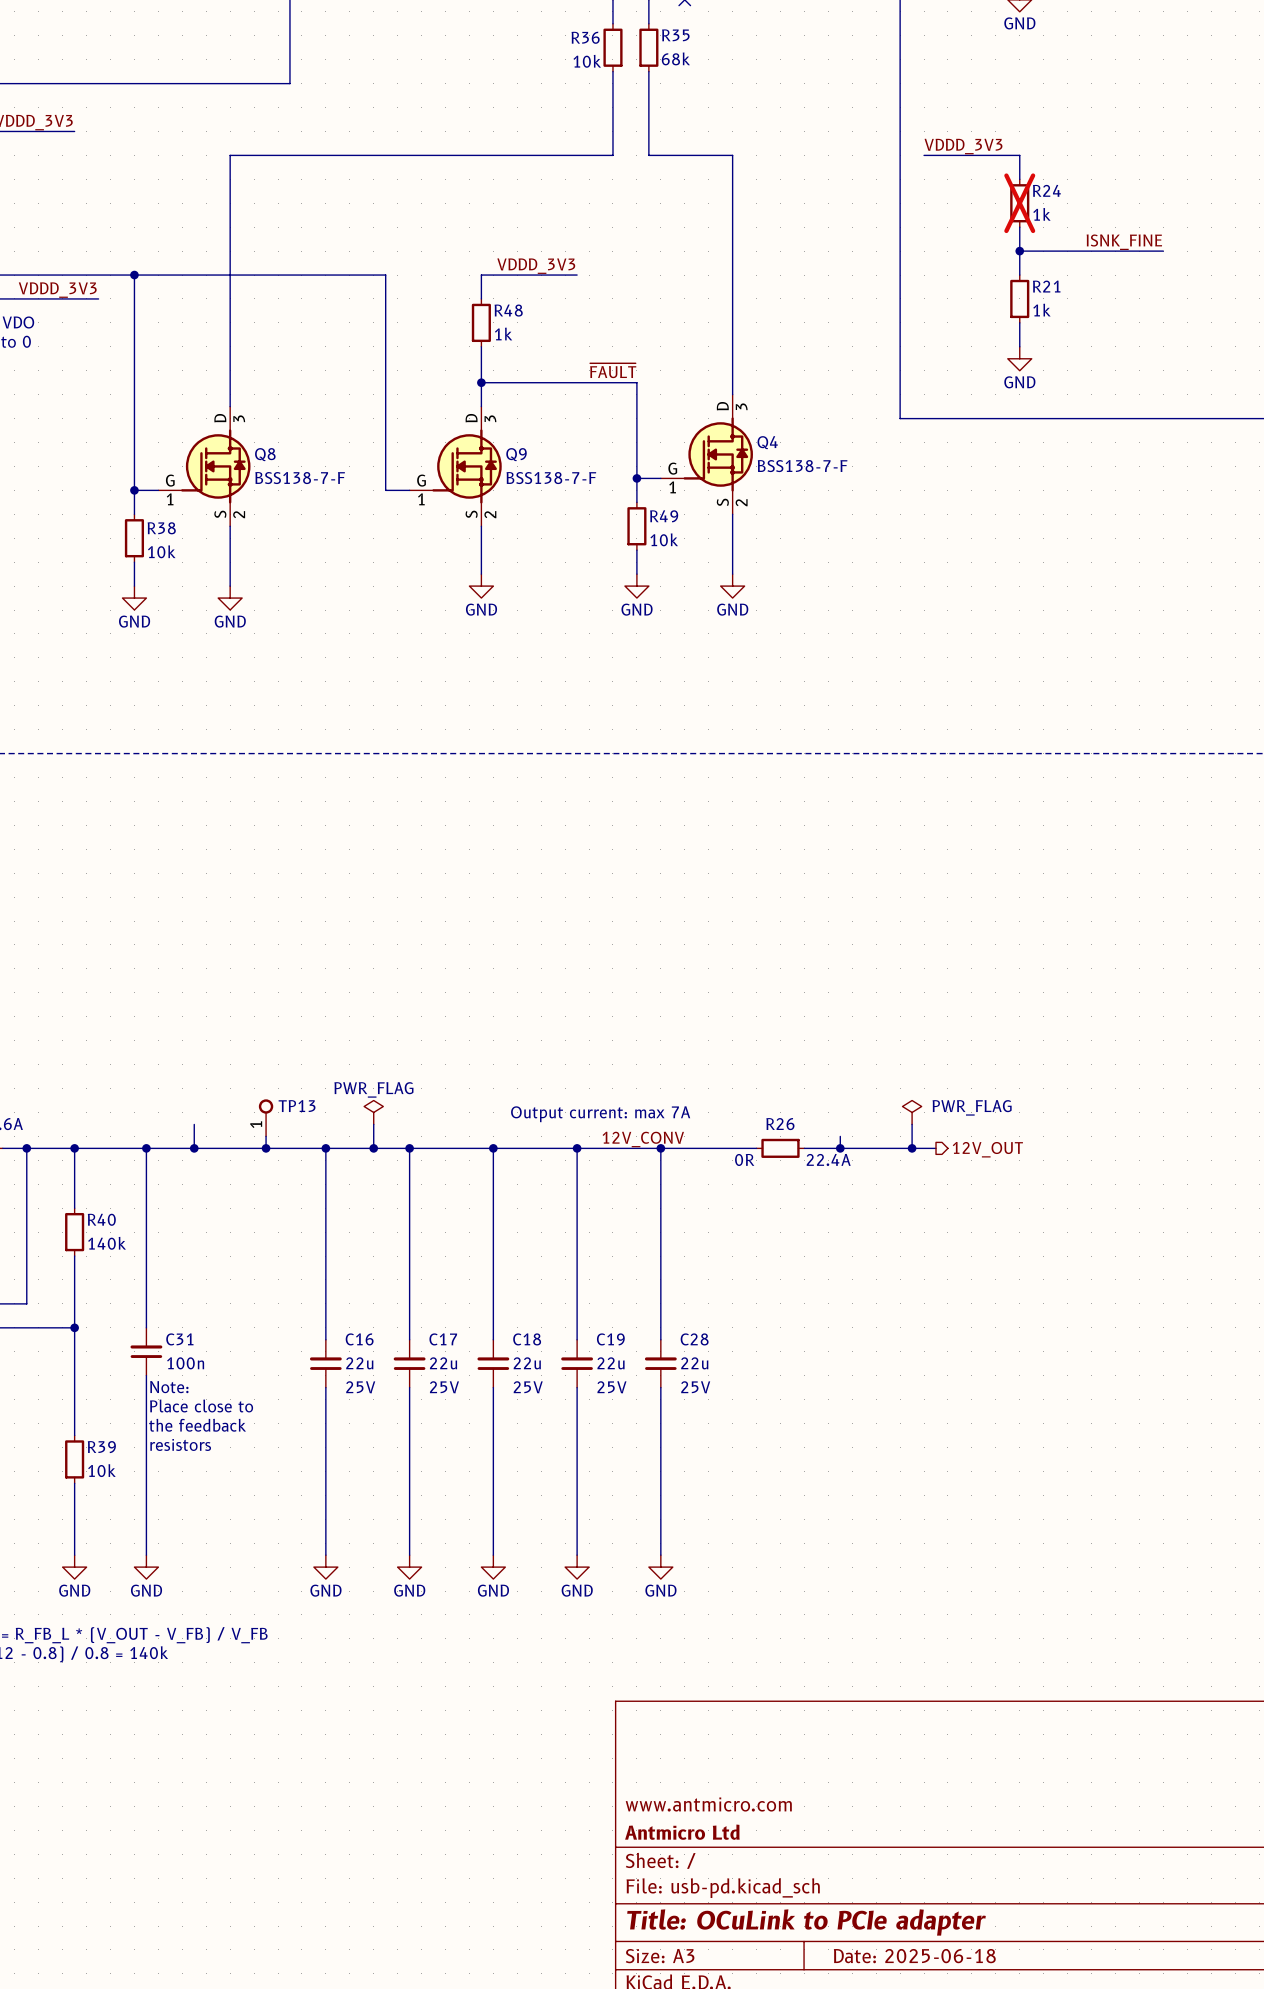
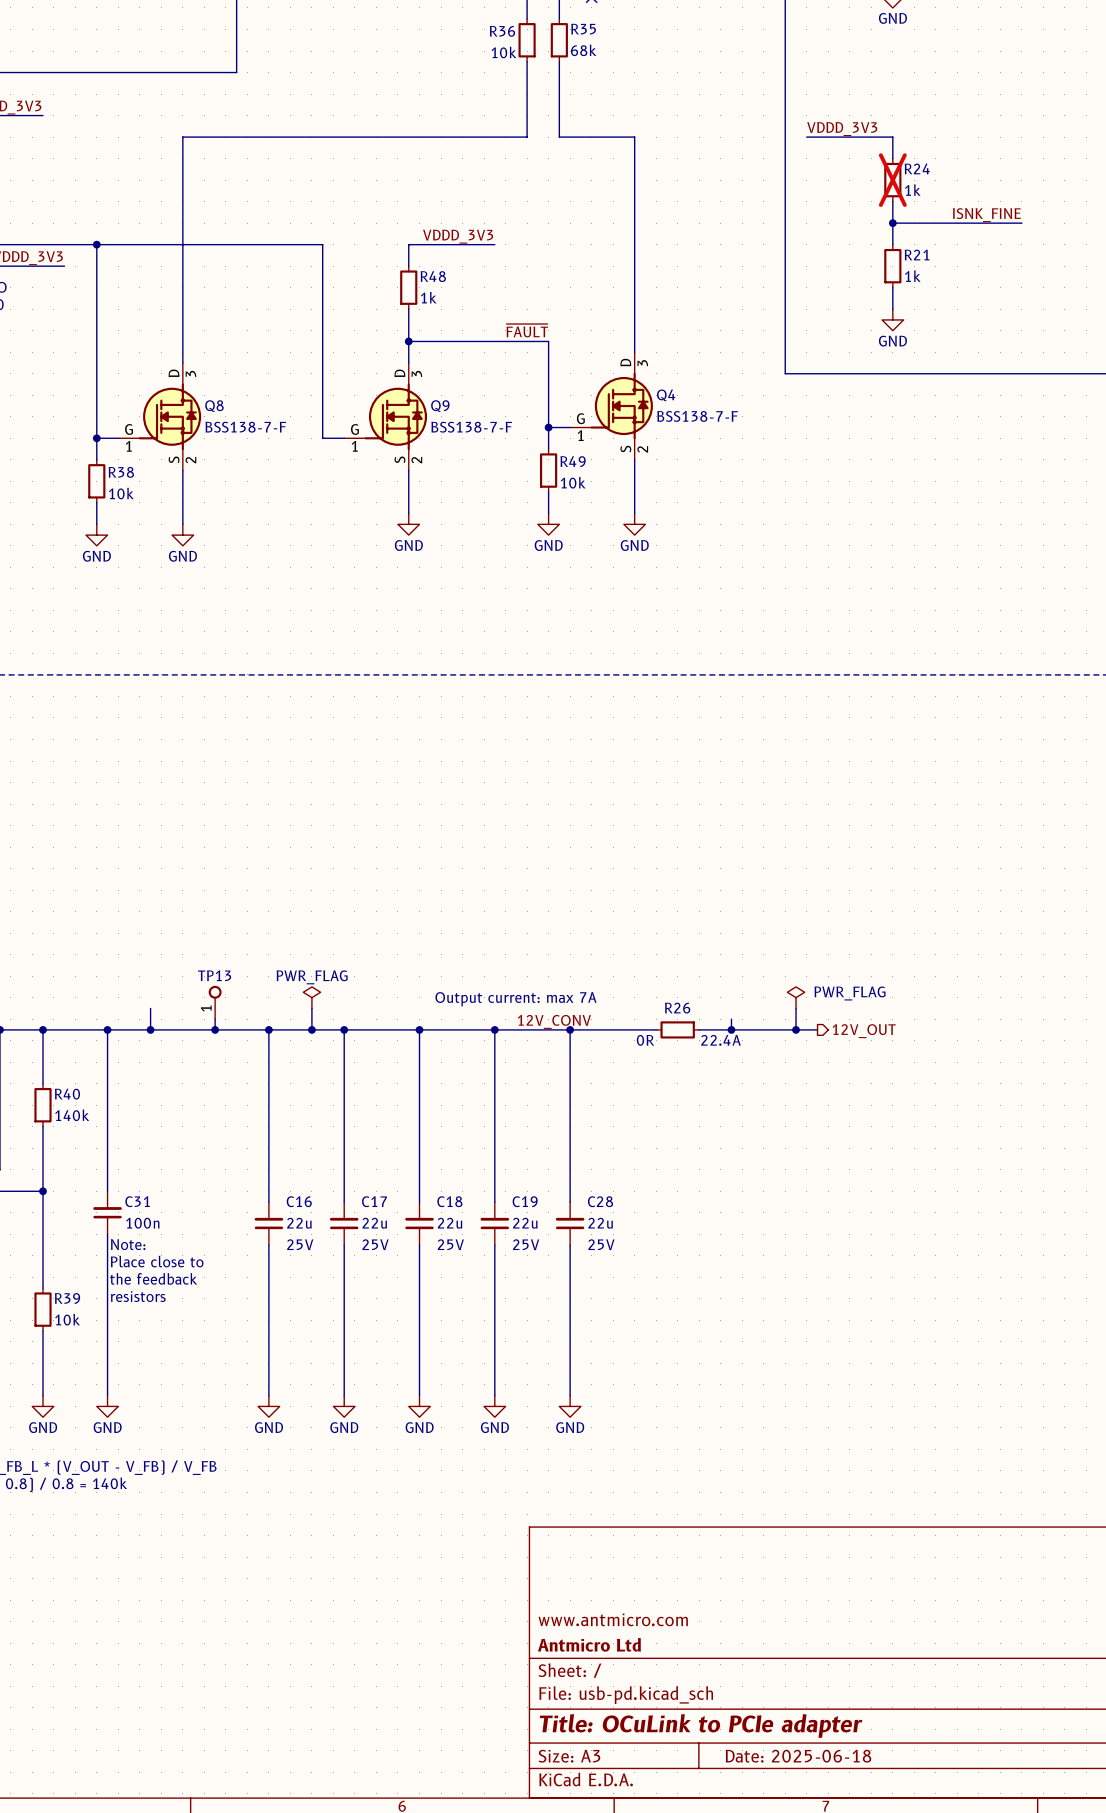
TP13 name position: TP13 (297, 1106) -> TP13 (214, 975)

